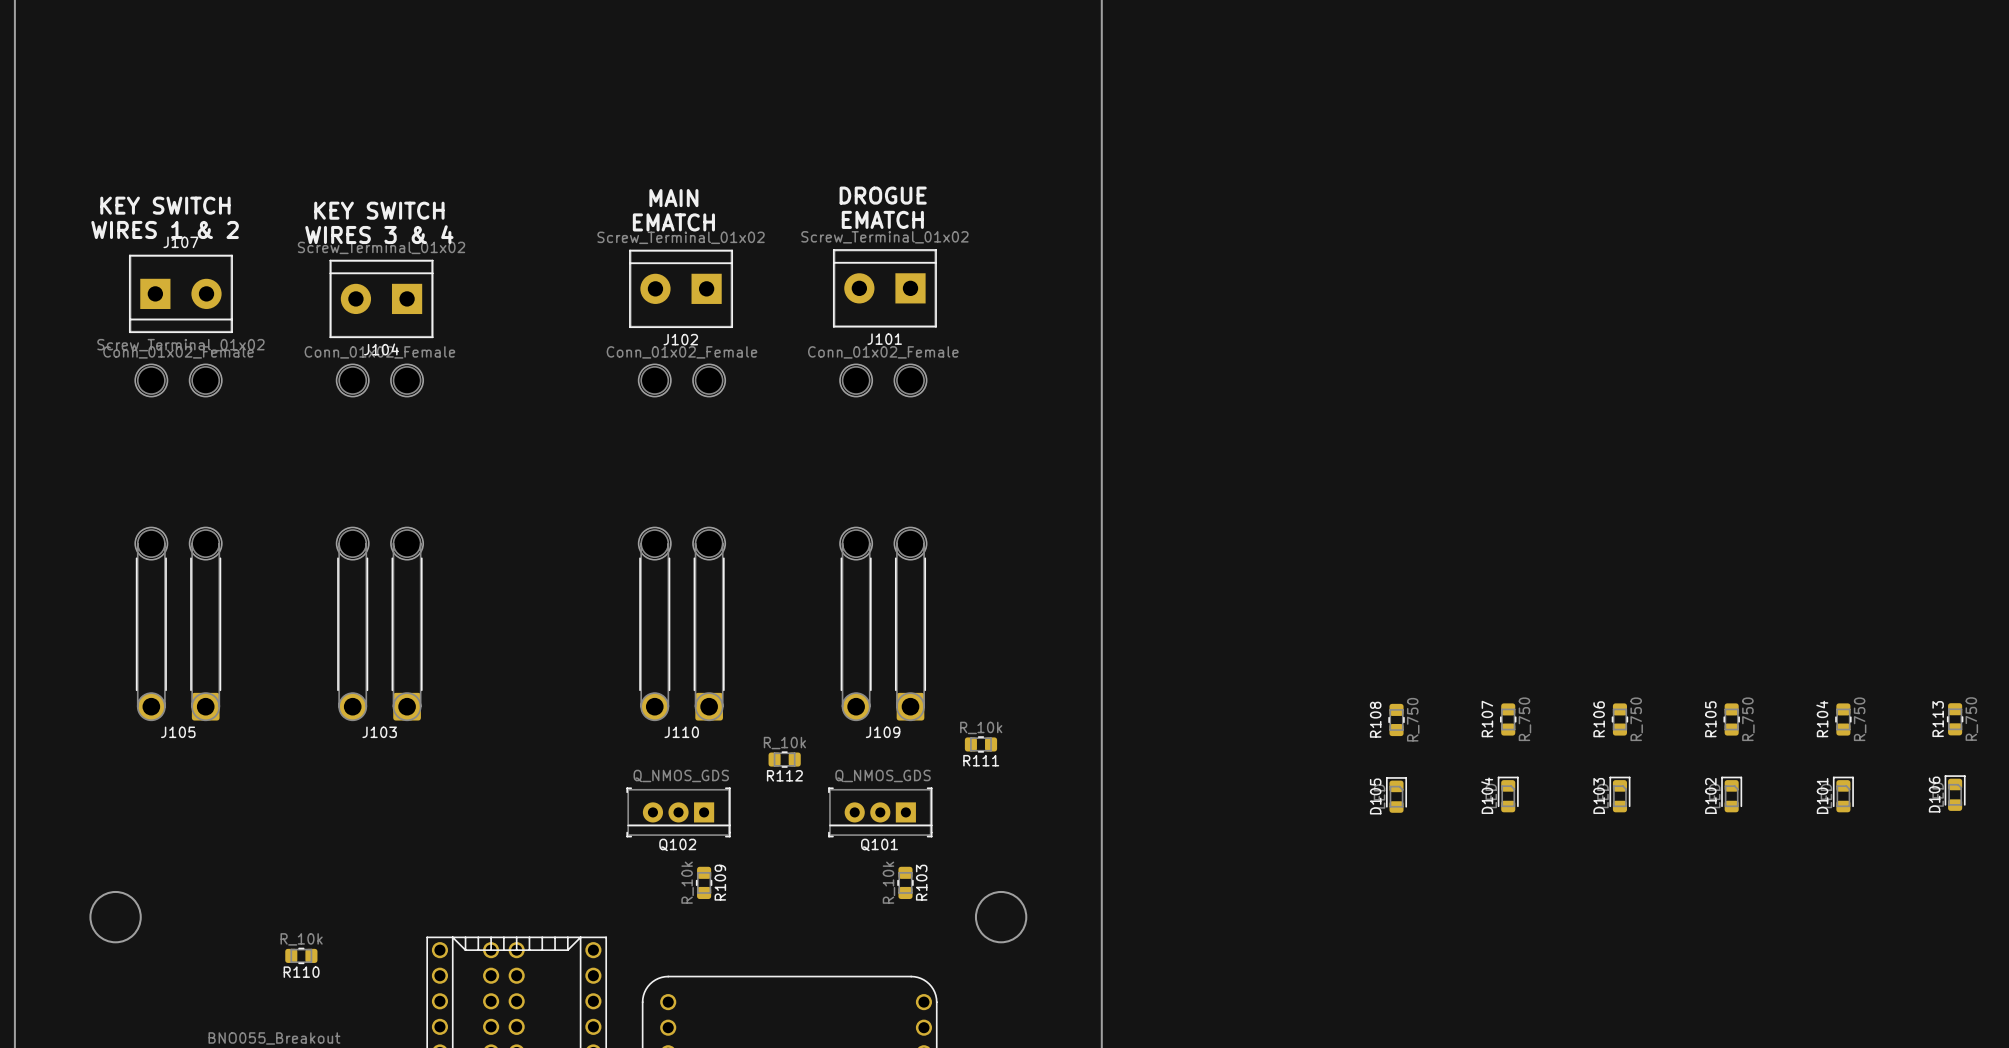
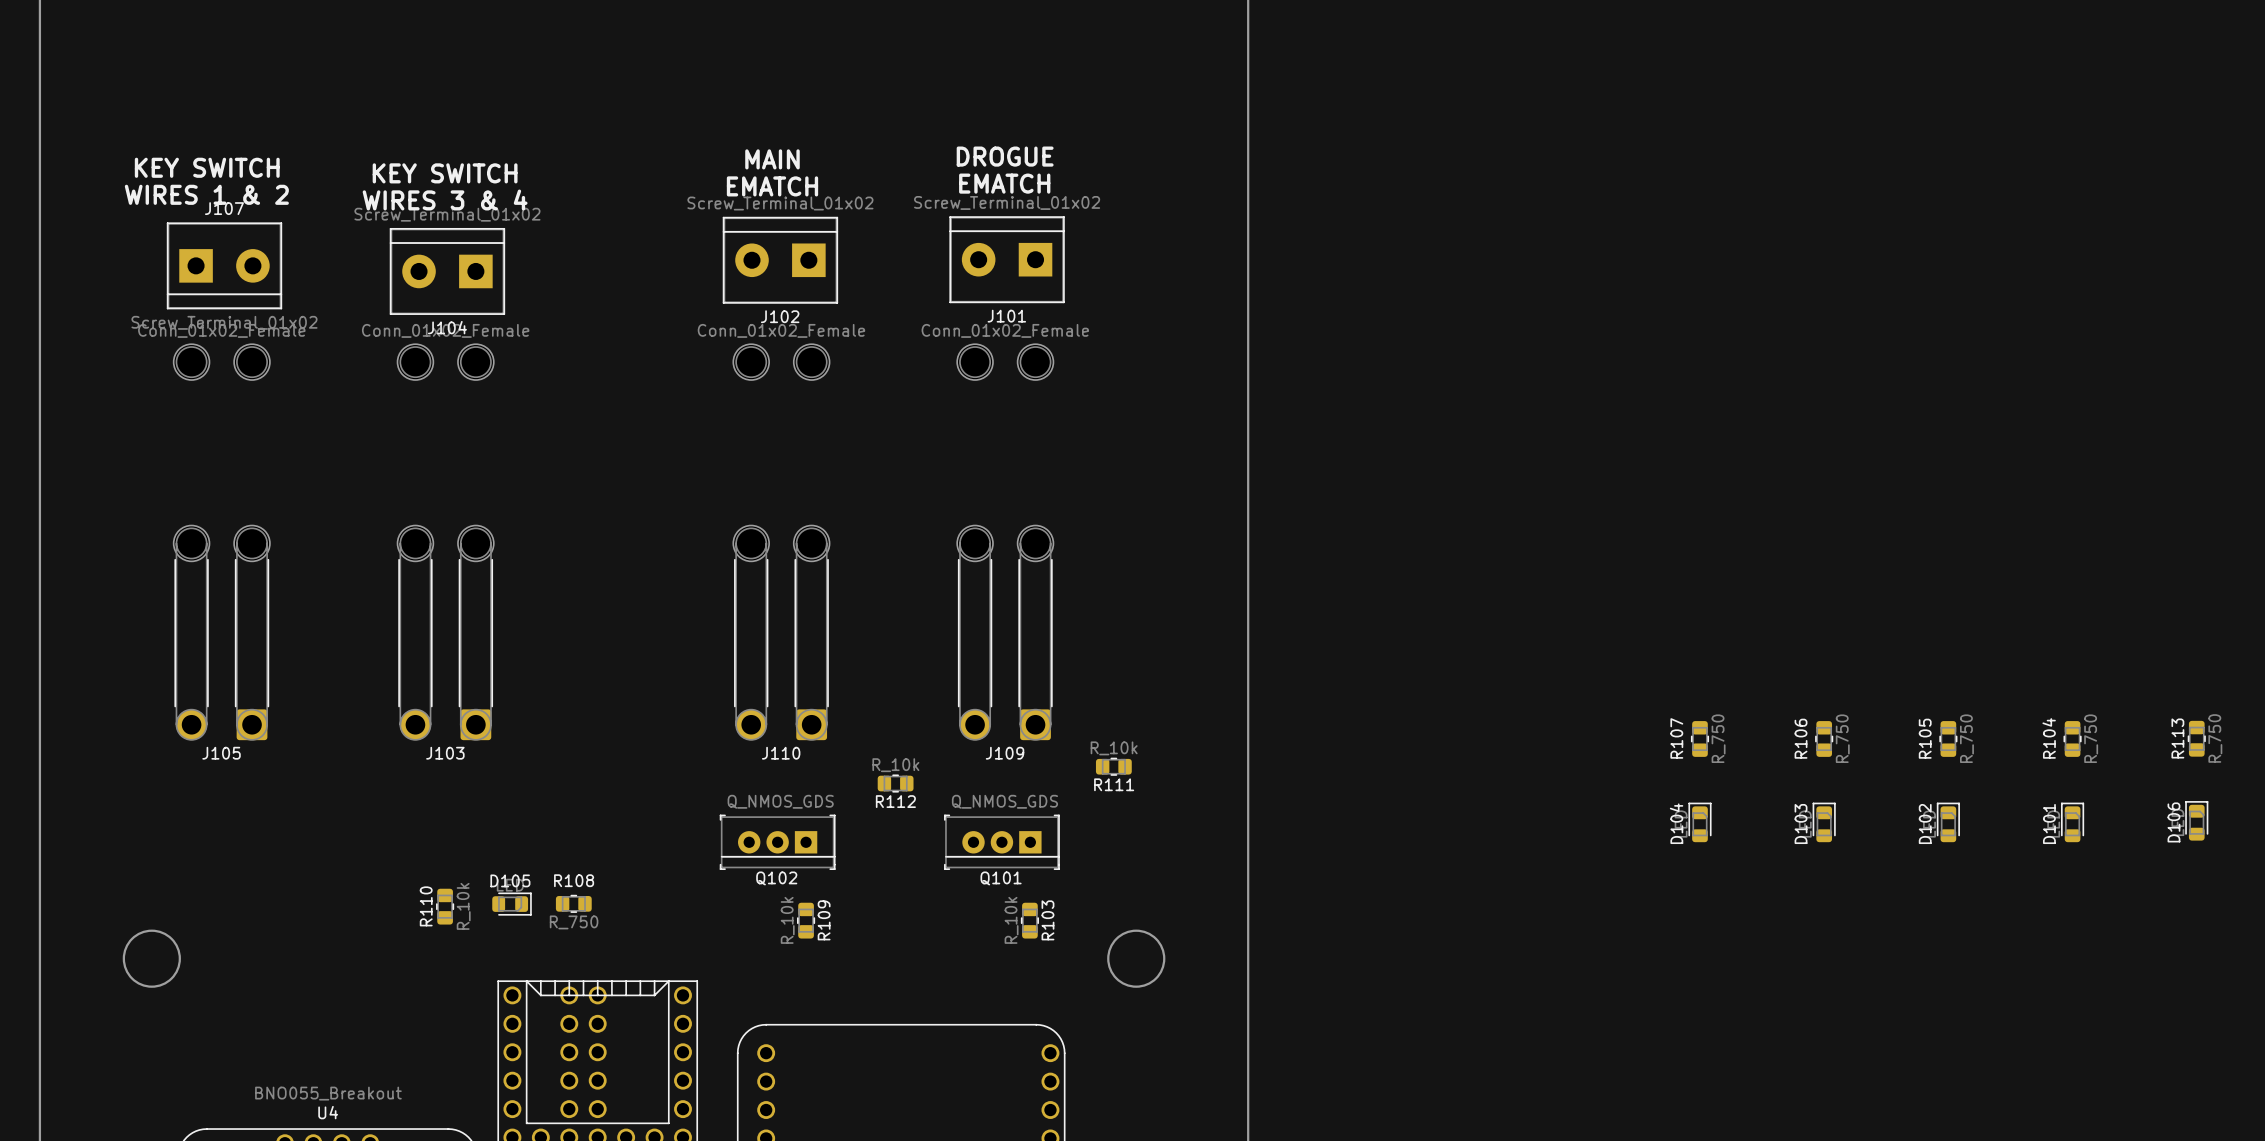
R108 rotation: 0° (1396, 719) -> 90° clockwise (573, 903)
R108 position: (1396, 719) -> (573, 903)
D105 rotation: 0° (1396, 795) -> 90° clockwise (511, 904)
D105 position: (1396, 795) -> (511, 904)
R110 rotation: 0° (301, 955) -> 90° clockwise (445, 906)
R110 position: (301, 955) -> (445, 906)

